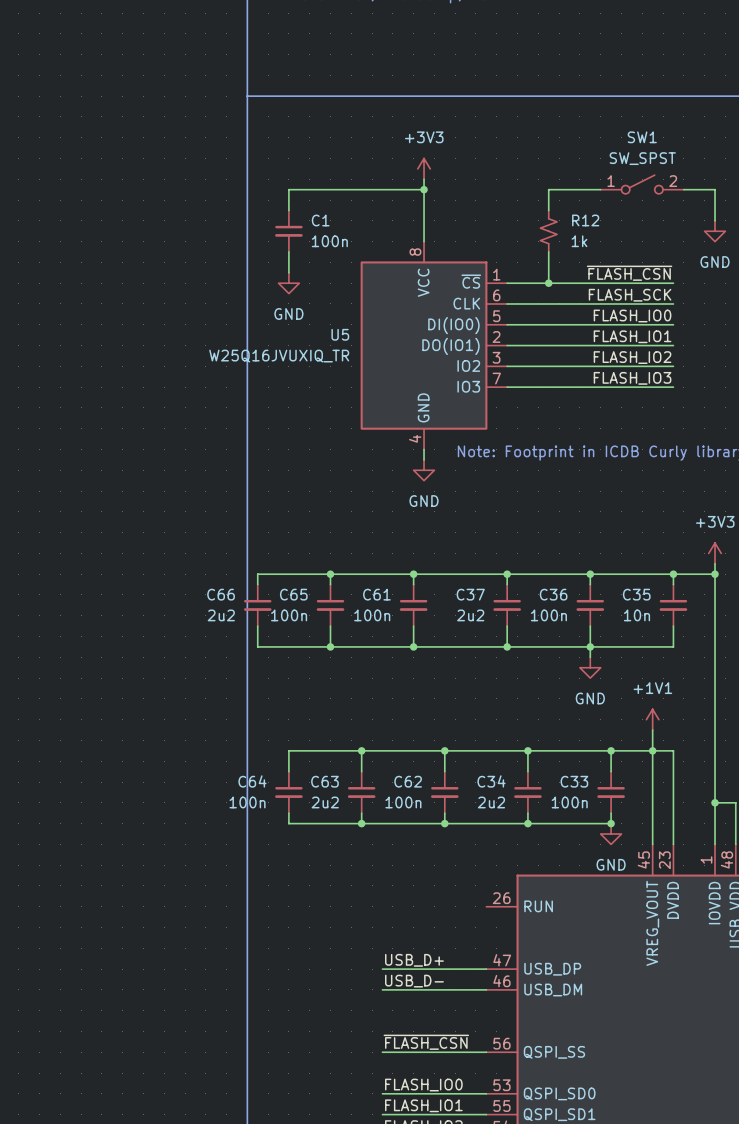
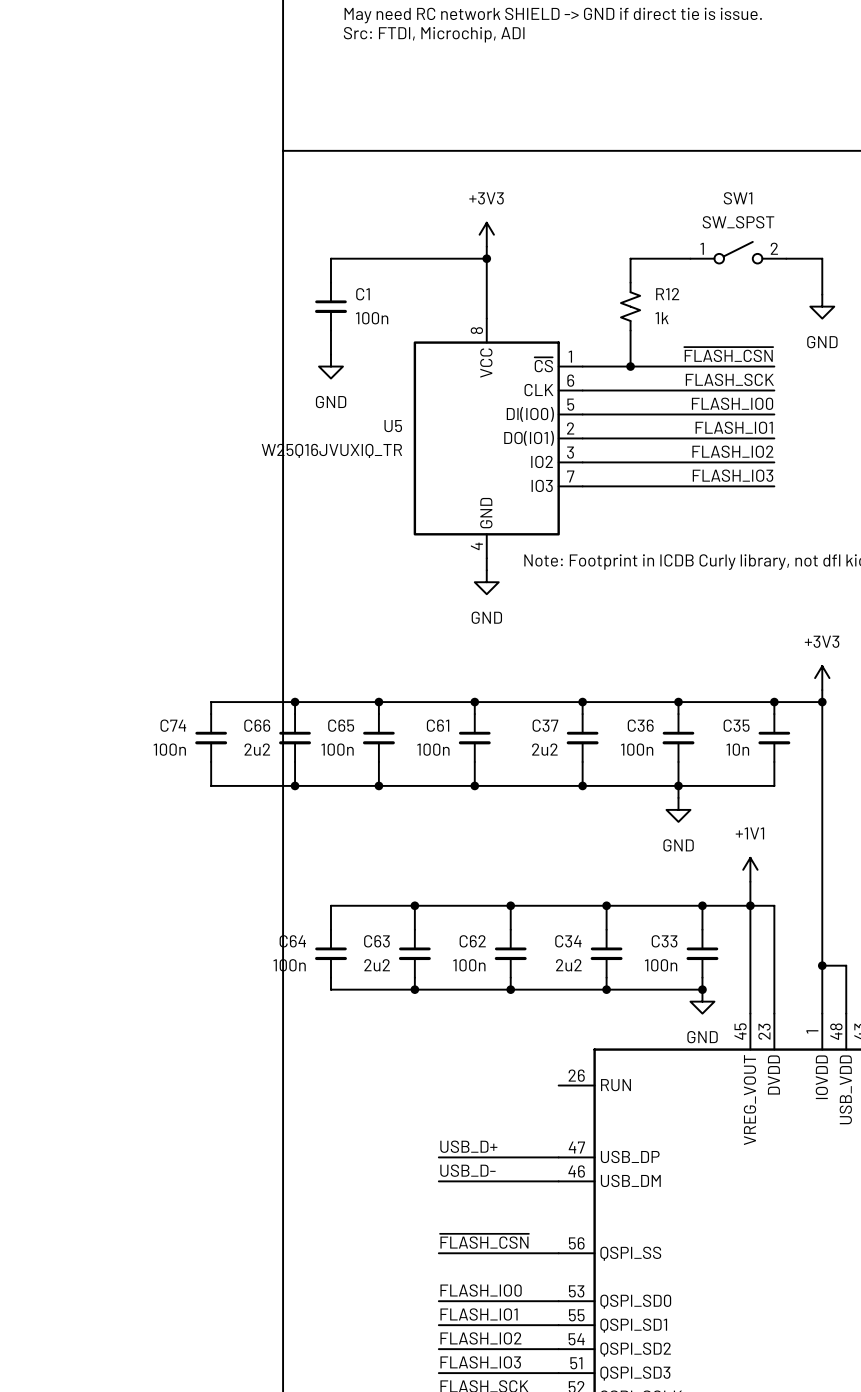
wire: none -> (295, 702) (211, 702) (211, 714)
junction: none -> (295, 702)
C74: none -> 100n (211, 738)
wire: none -> (211, 761) (211, 785) (295, 785)
junction: none -> (295, 785)

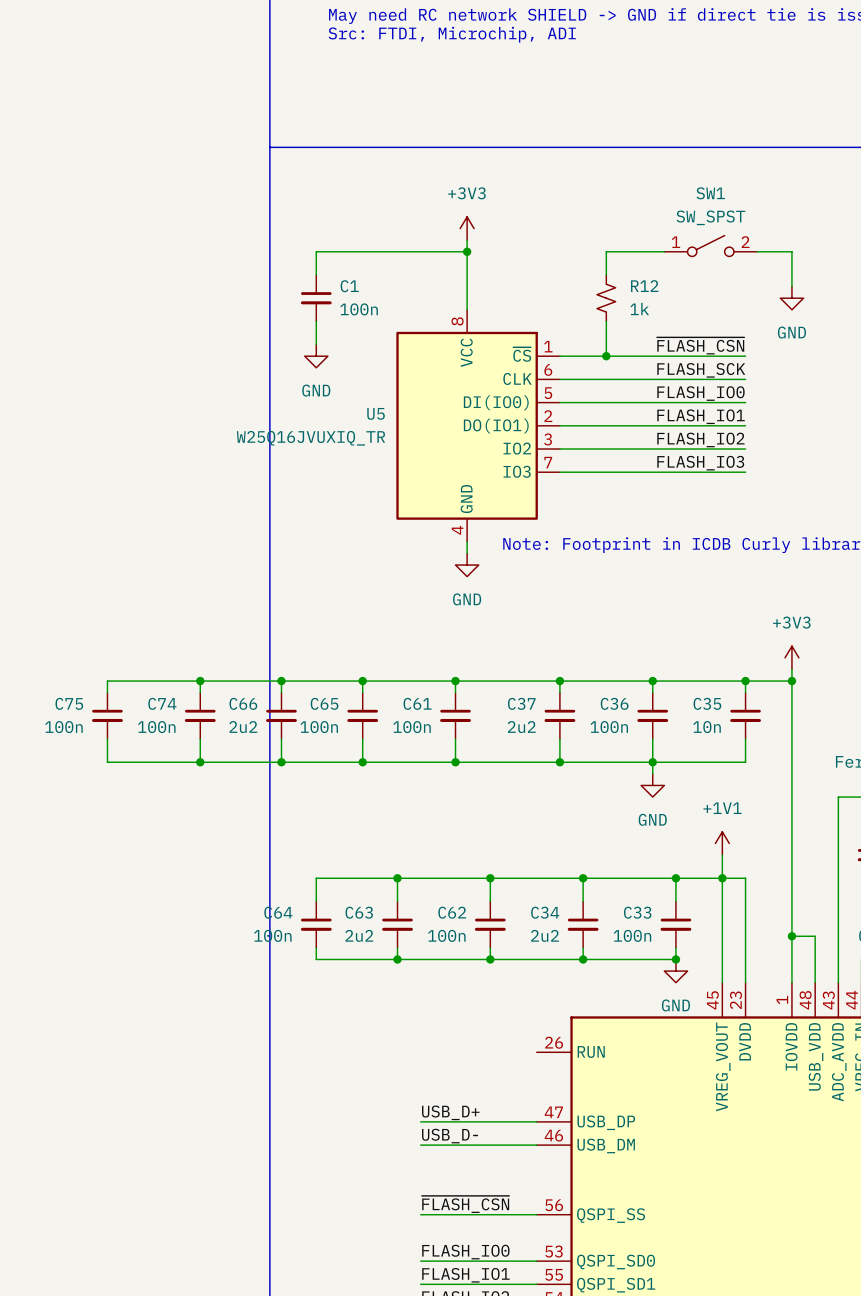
wire: none -> (200, 681) (107, 681) (107, 692)
junction: none -> (200, 681)
C75: none -> 100n (107, 715)
wire: none -> (107, 739) (107, 762) (200, 762)
junction: none -> (200, 762)

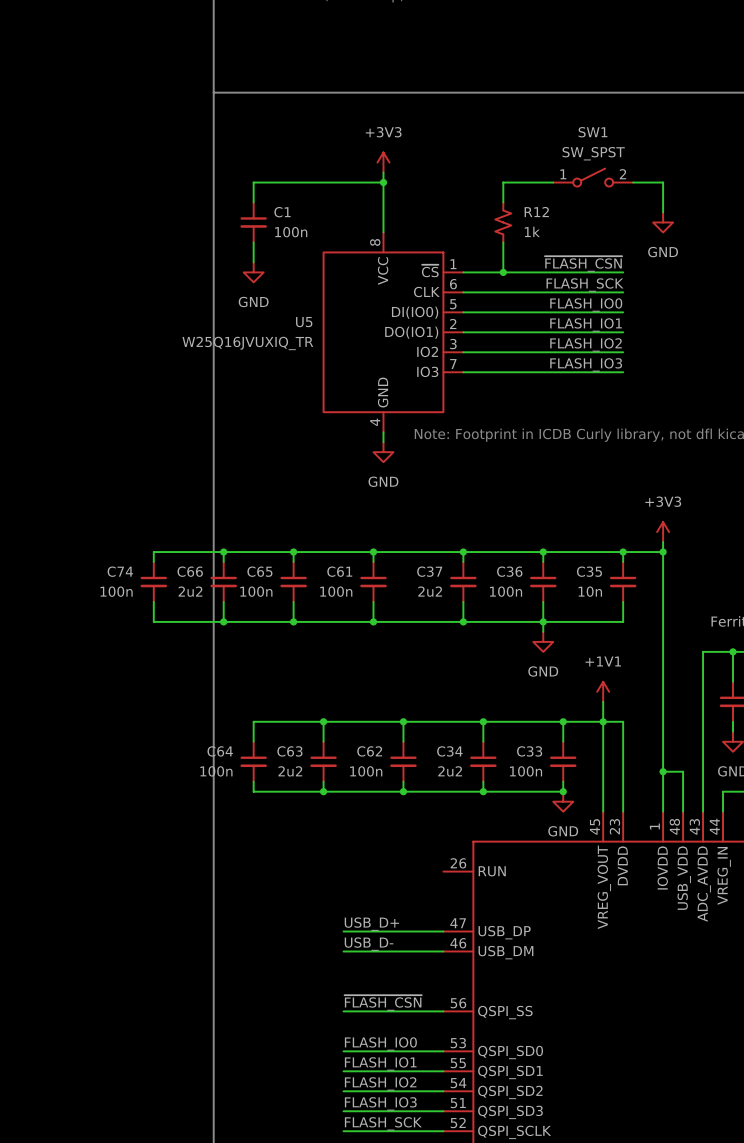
wire: (200, 681) (107, 681) (107, 692) -> none
junction: (200, 681) -> none
C75: 100n (107, 715) -> none
wire: (107, 739) (107, 762) (200, 762) -> none
junction: (200, 762) -> none

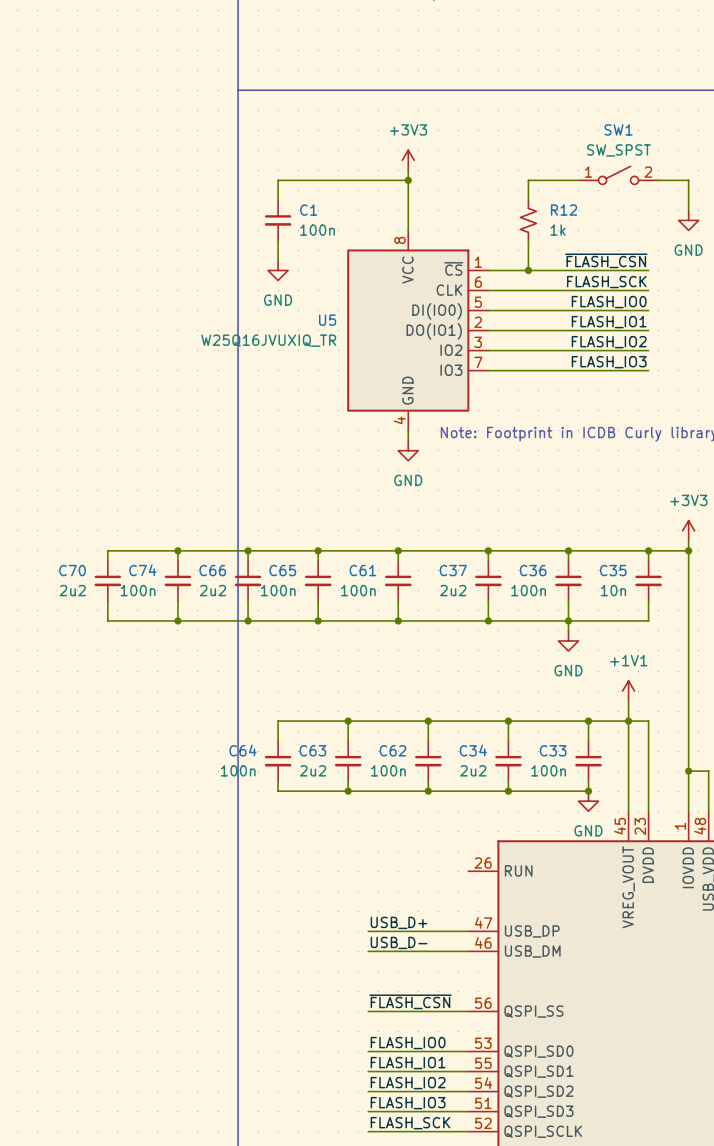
wire: none -> (177, 550) (107, 550) (107, 560)
junction: none -> (177, 550)
C70: none -> 2u2 (107, 580)
wire: none -> (107, 600) (107, 620) (177, 620)
junction: none -> (177, 620)

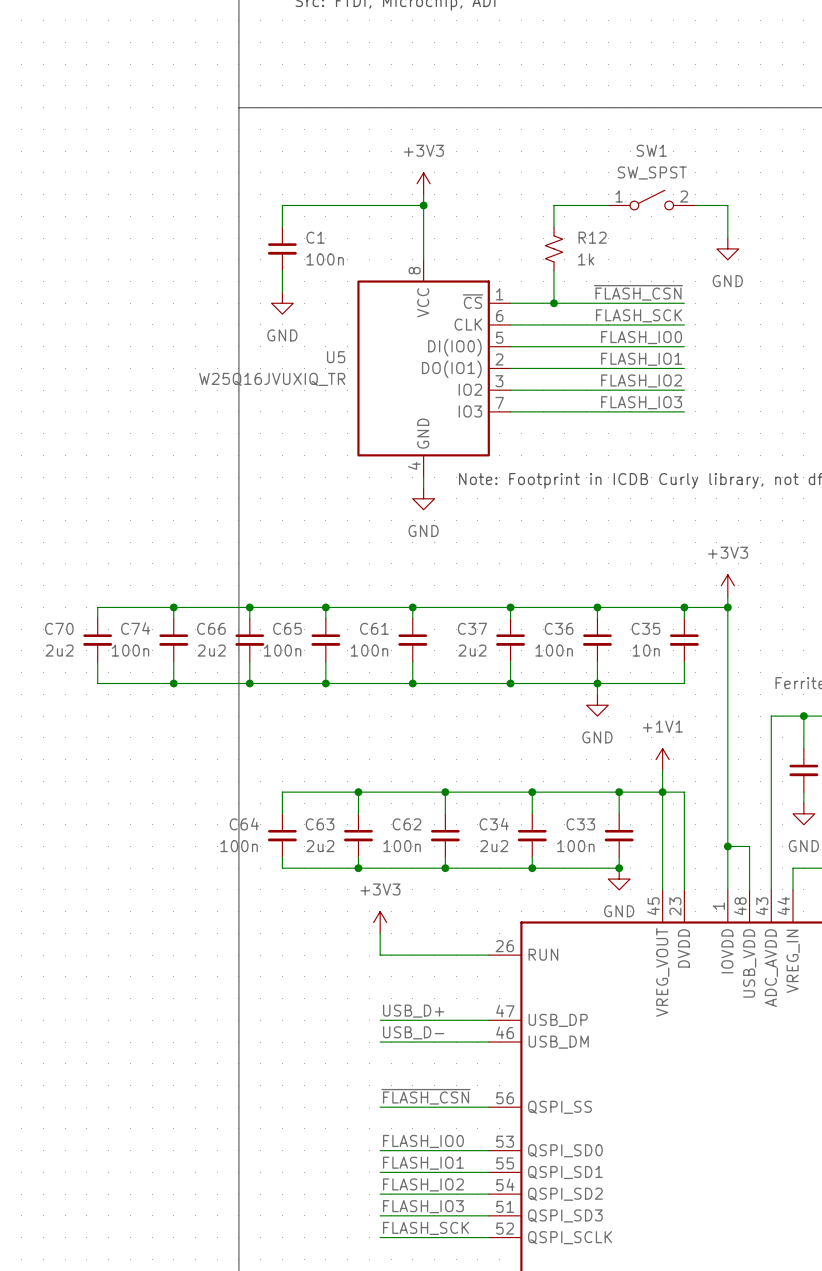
power symbol: none -> +3V3 (380, 922)
wire: none -> (380, 933) (380, 955) (488, 955)

